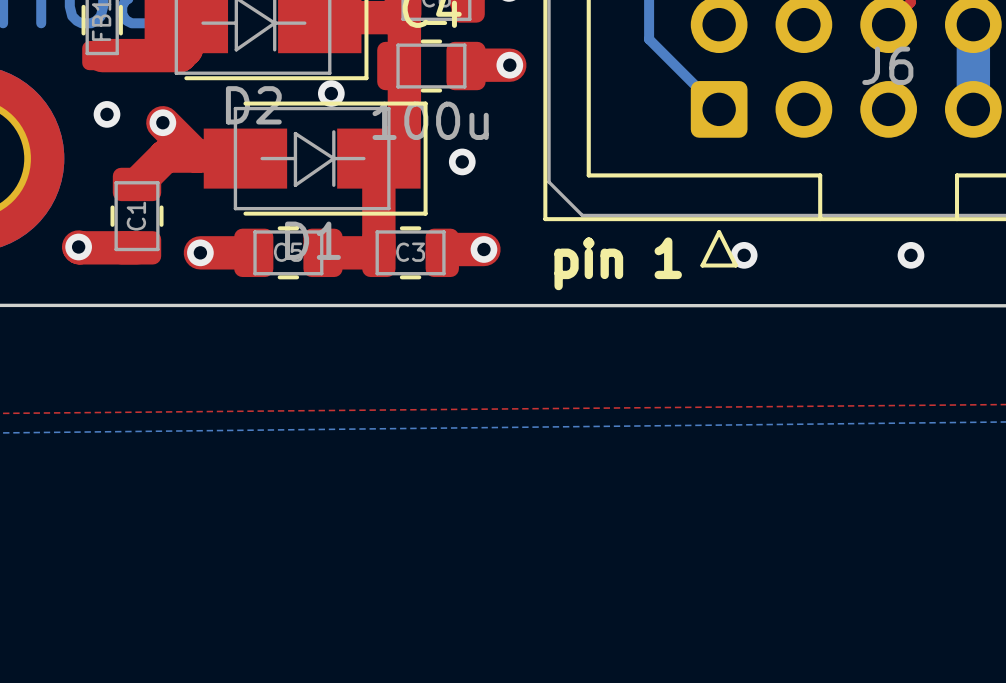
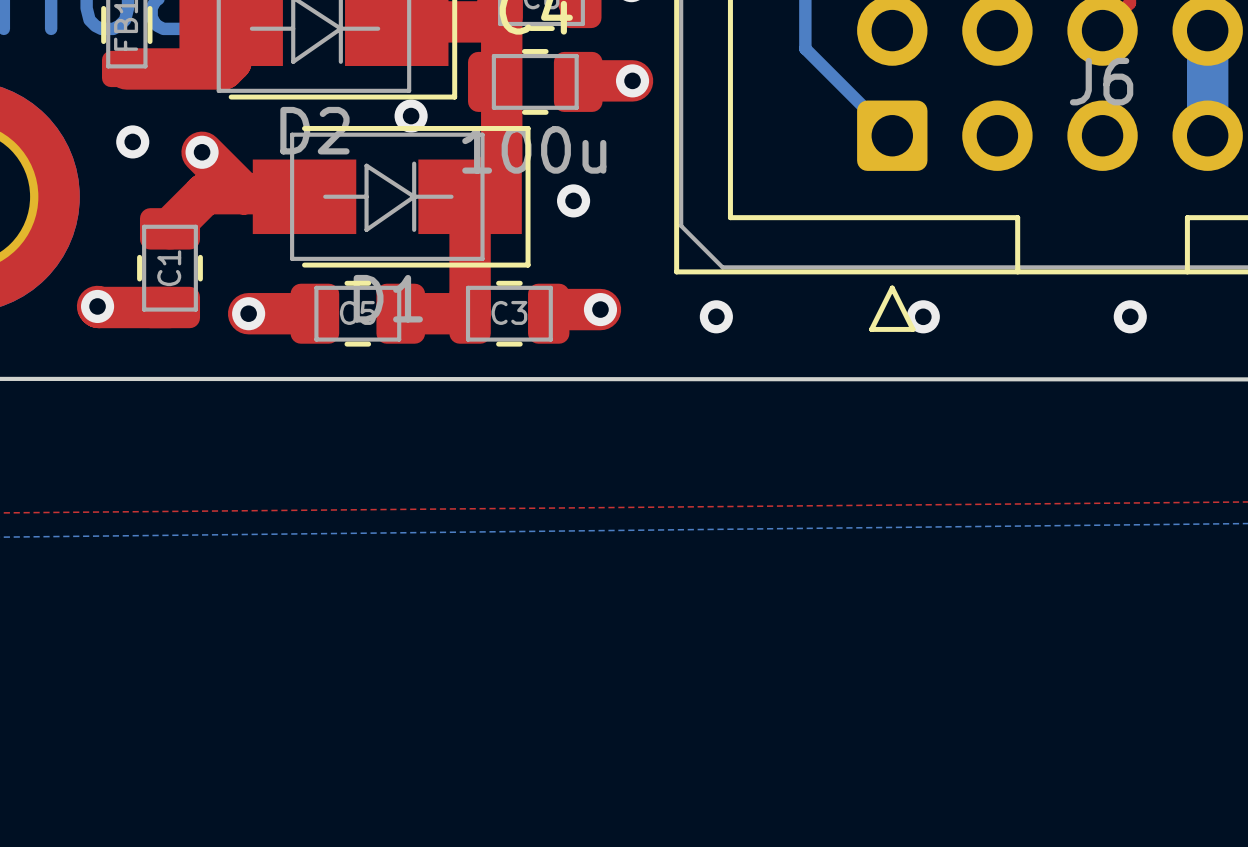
via: none -> (716, 316)
text: pin 1 (618, 263) -> none

